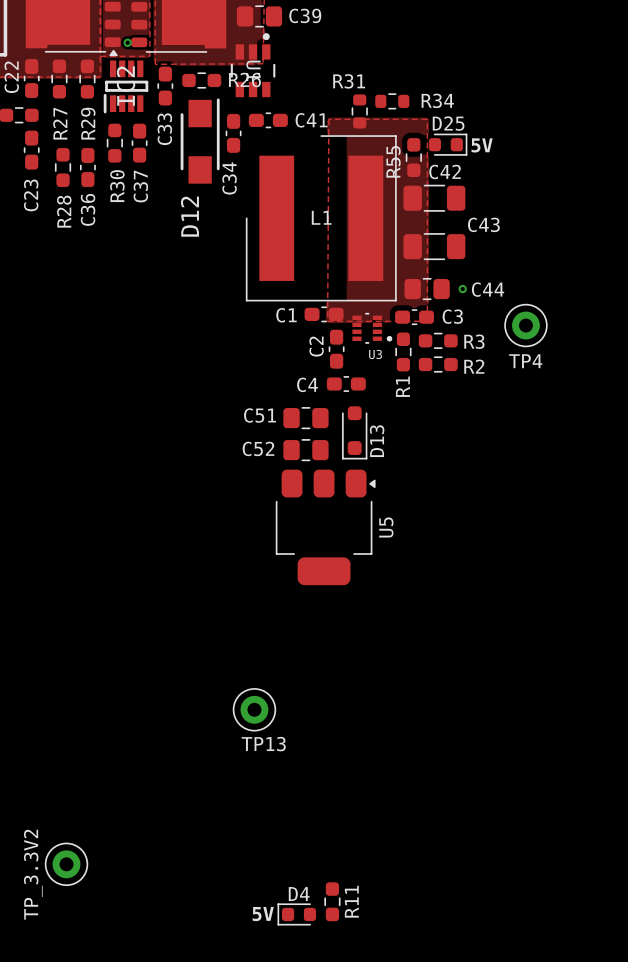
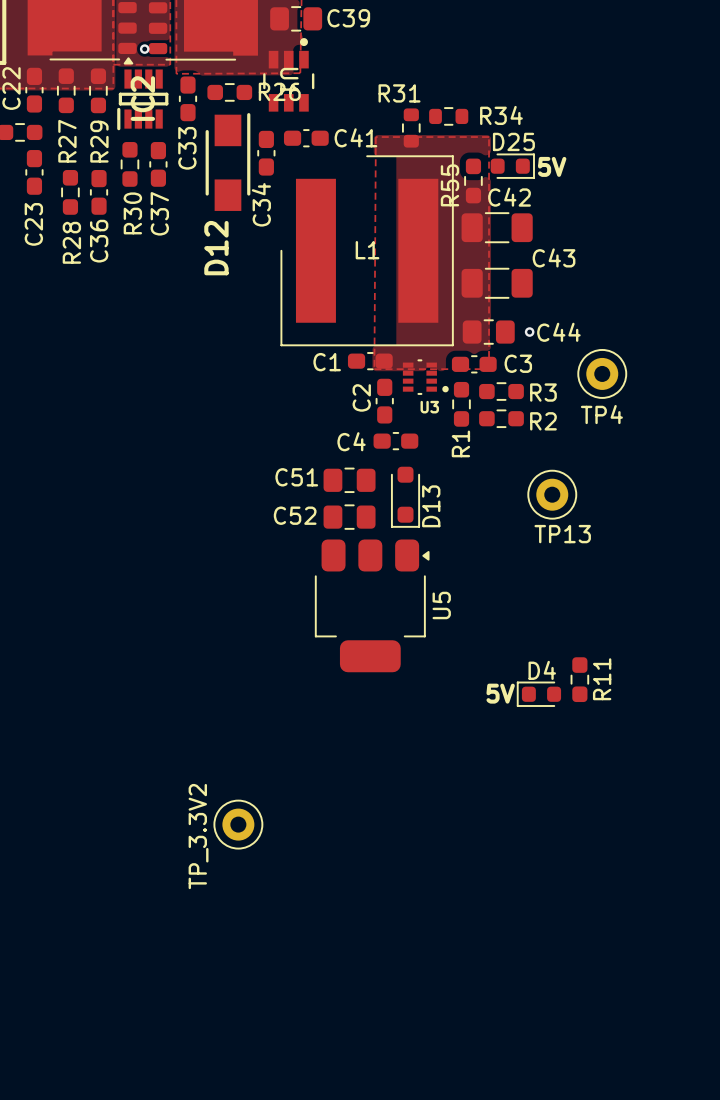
TP13 position: (254, 709) -> (552, 494)
TP_3.3V2 position: (66, 864) -> (238, 824)
R11 position: (332, 901) -> (579, 679)
D4 position: (296, 914) -> (538, 694)

